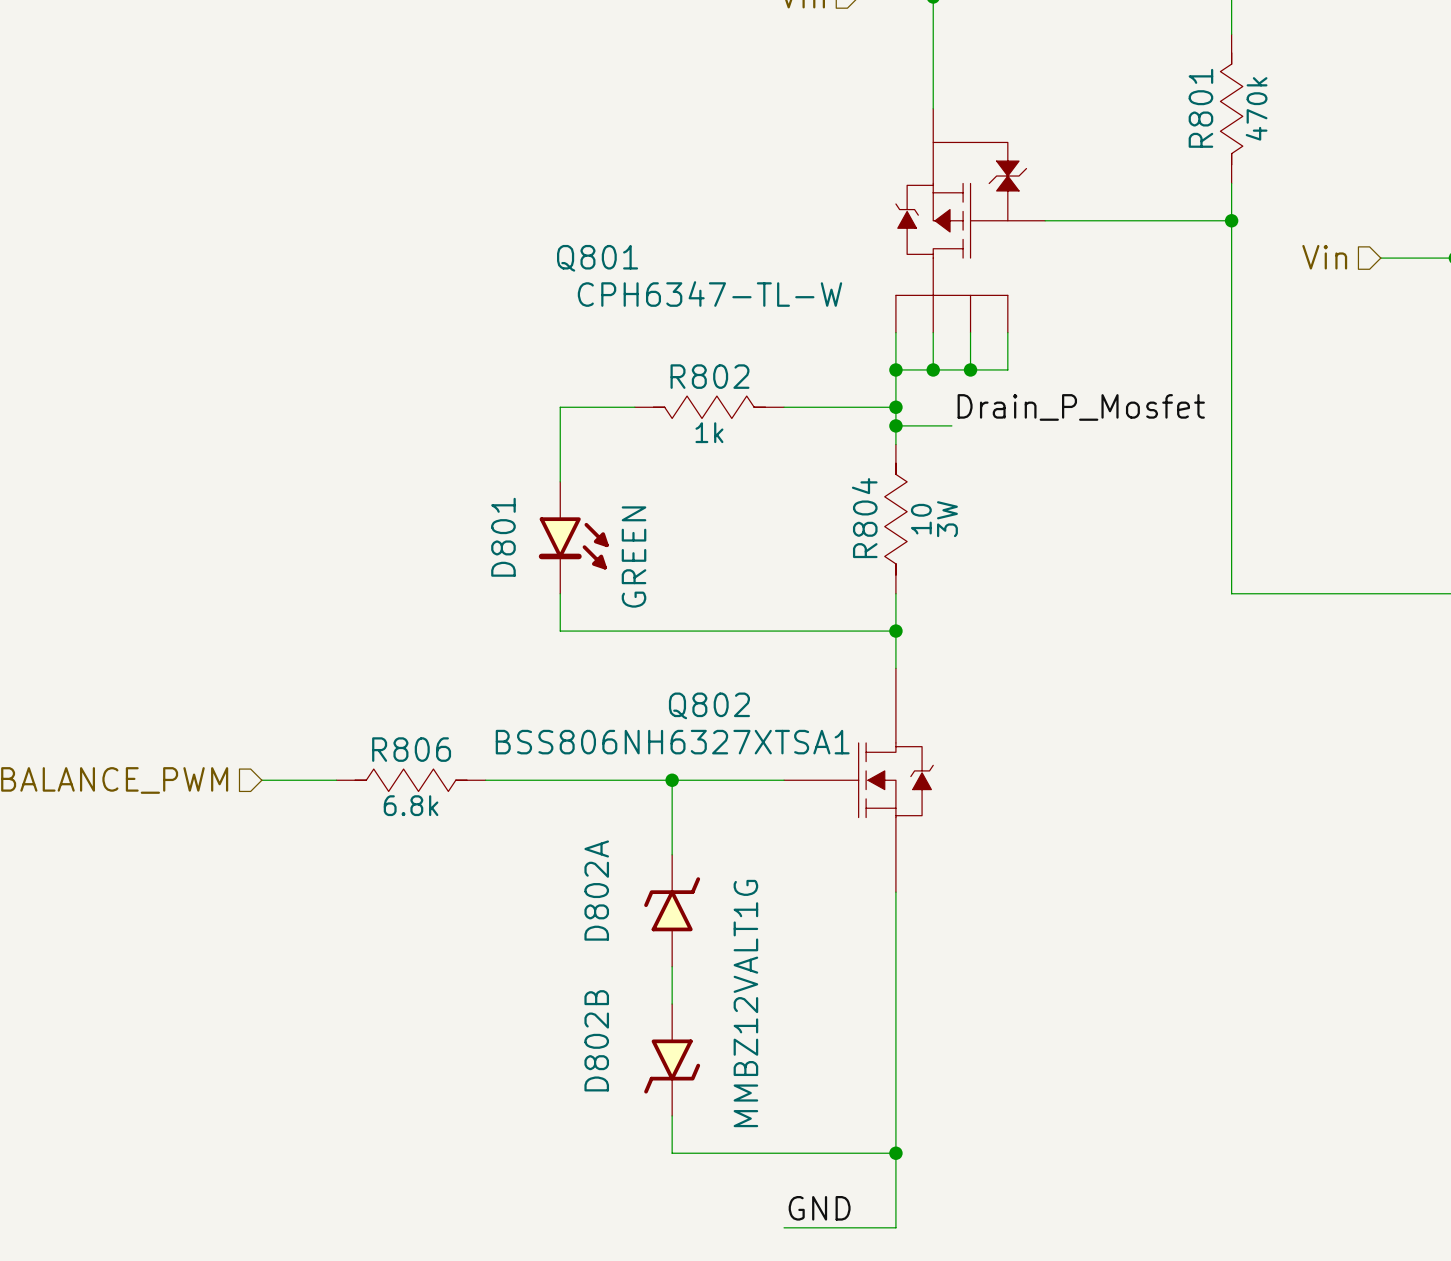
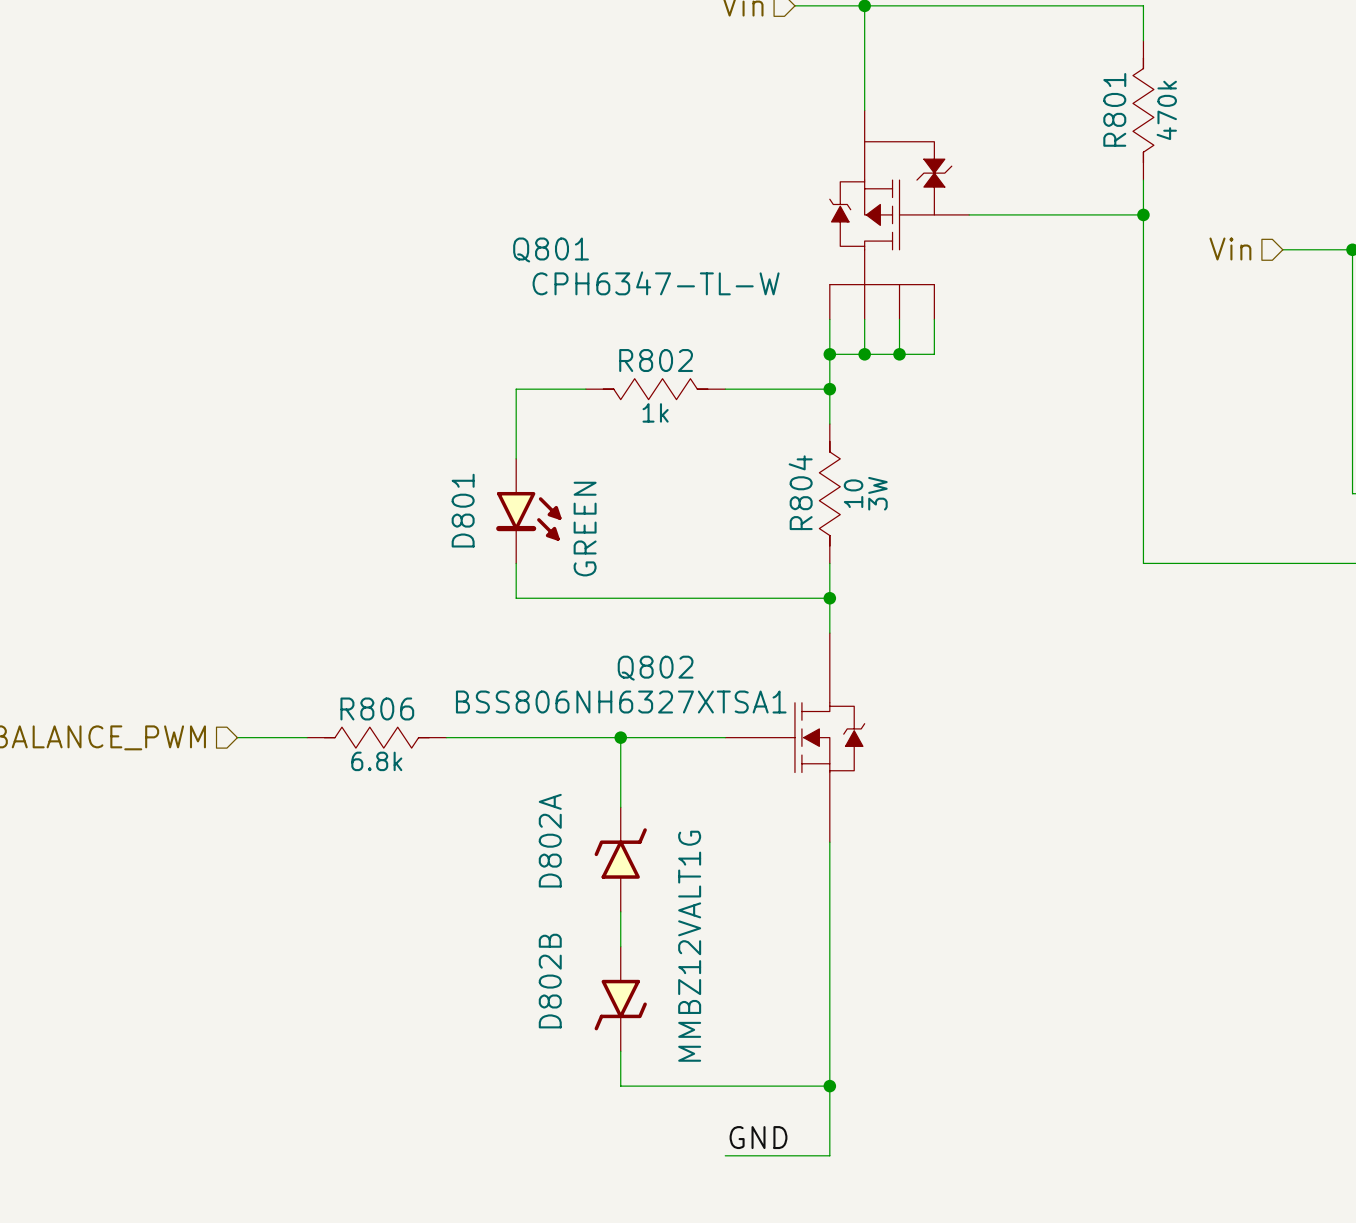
label: Drain_P_Mosfet (1081, 407) -> none
wire: (895, 425) (951, 425) -> none
junction: (895, 425) -> none

